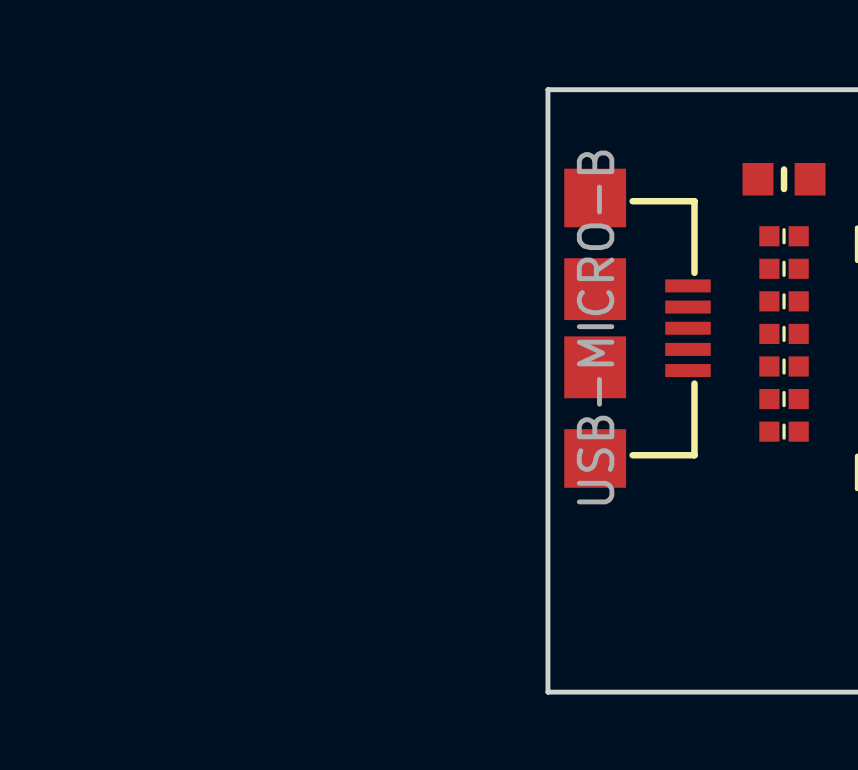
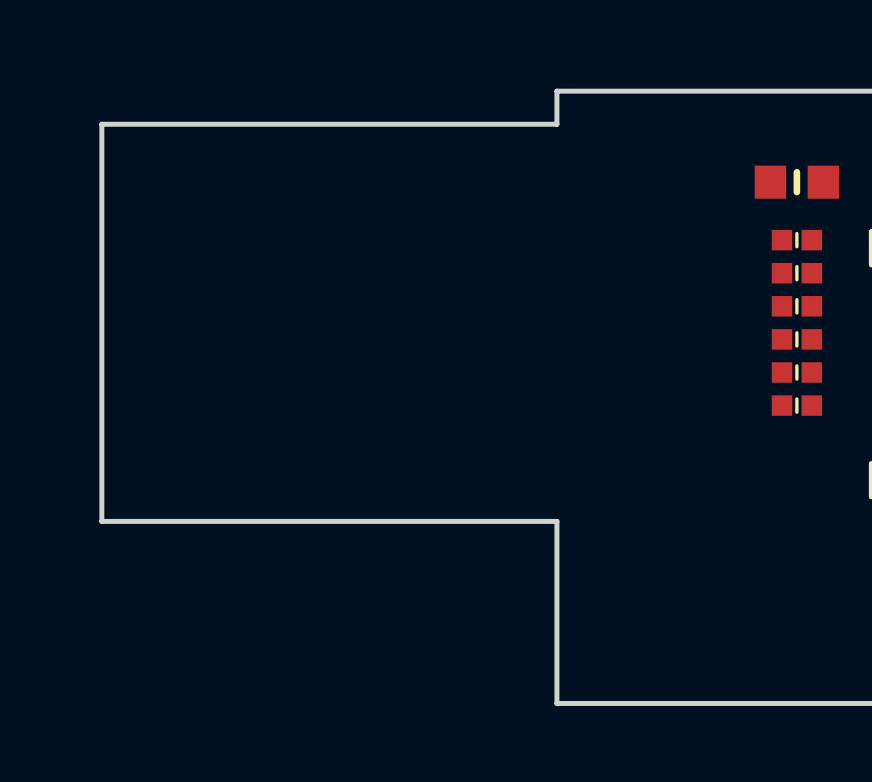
board edge: (547, 122) (547, 513) -> (556, 124) (101, 124) (101, 521) (556, 521)
part: USB-MICRO-B (637, 328) -> none
part: (784, 431) -> none

